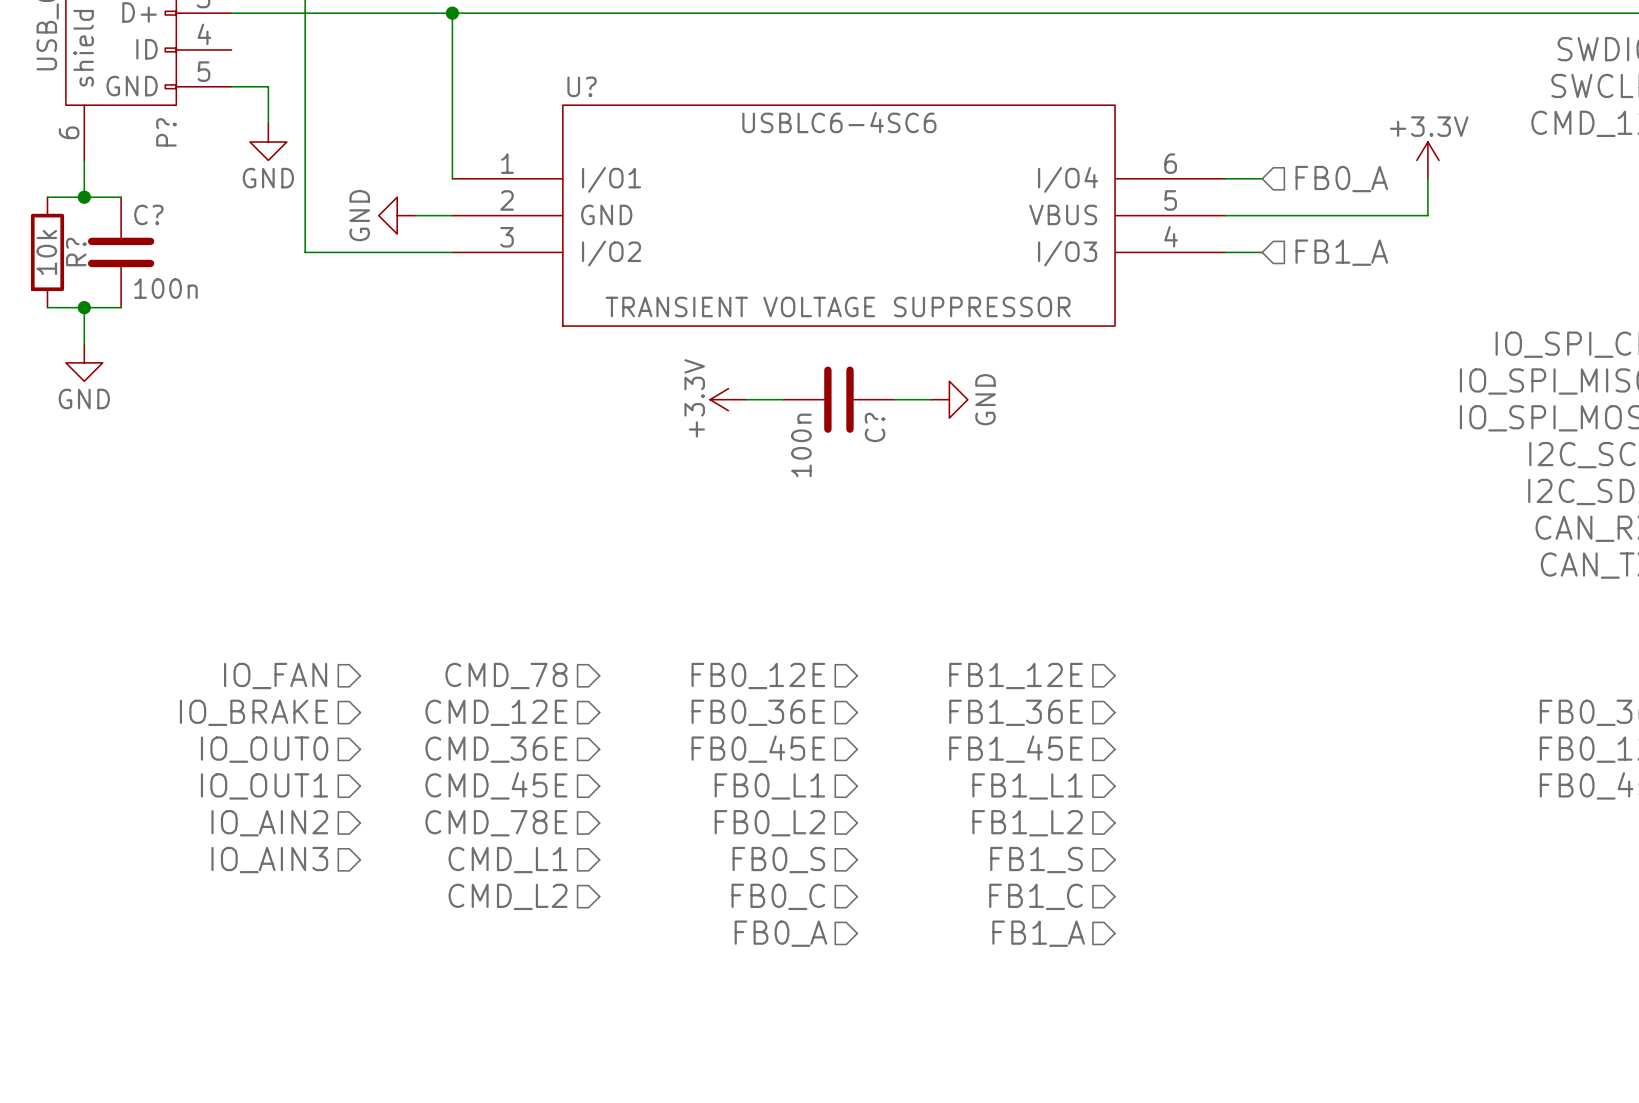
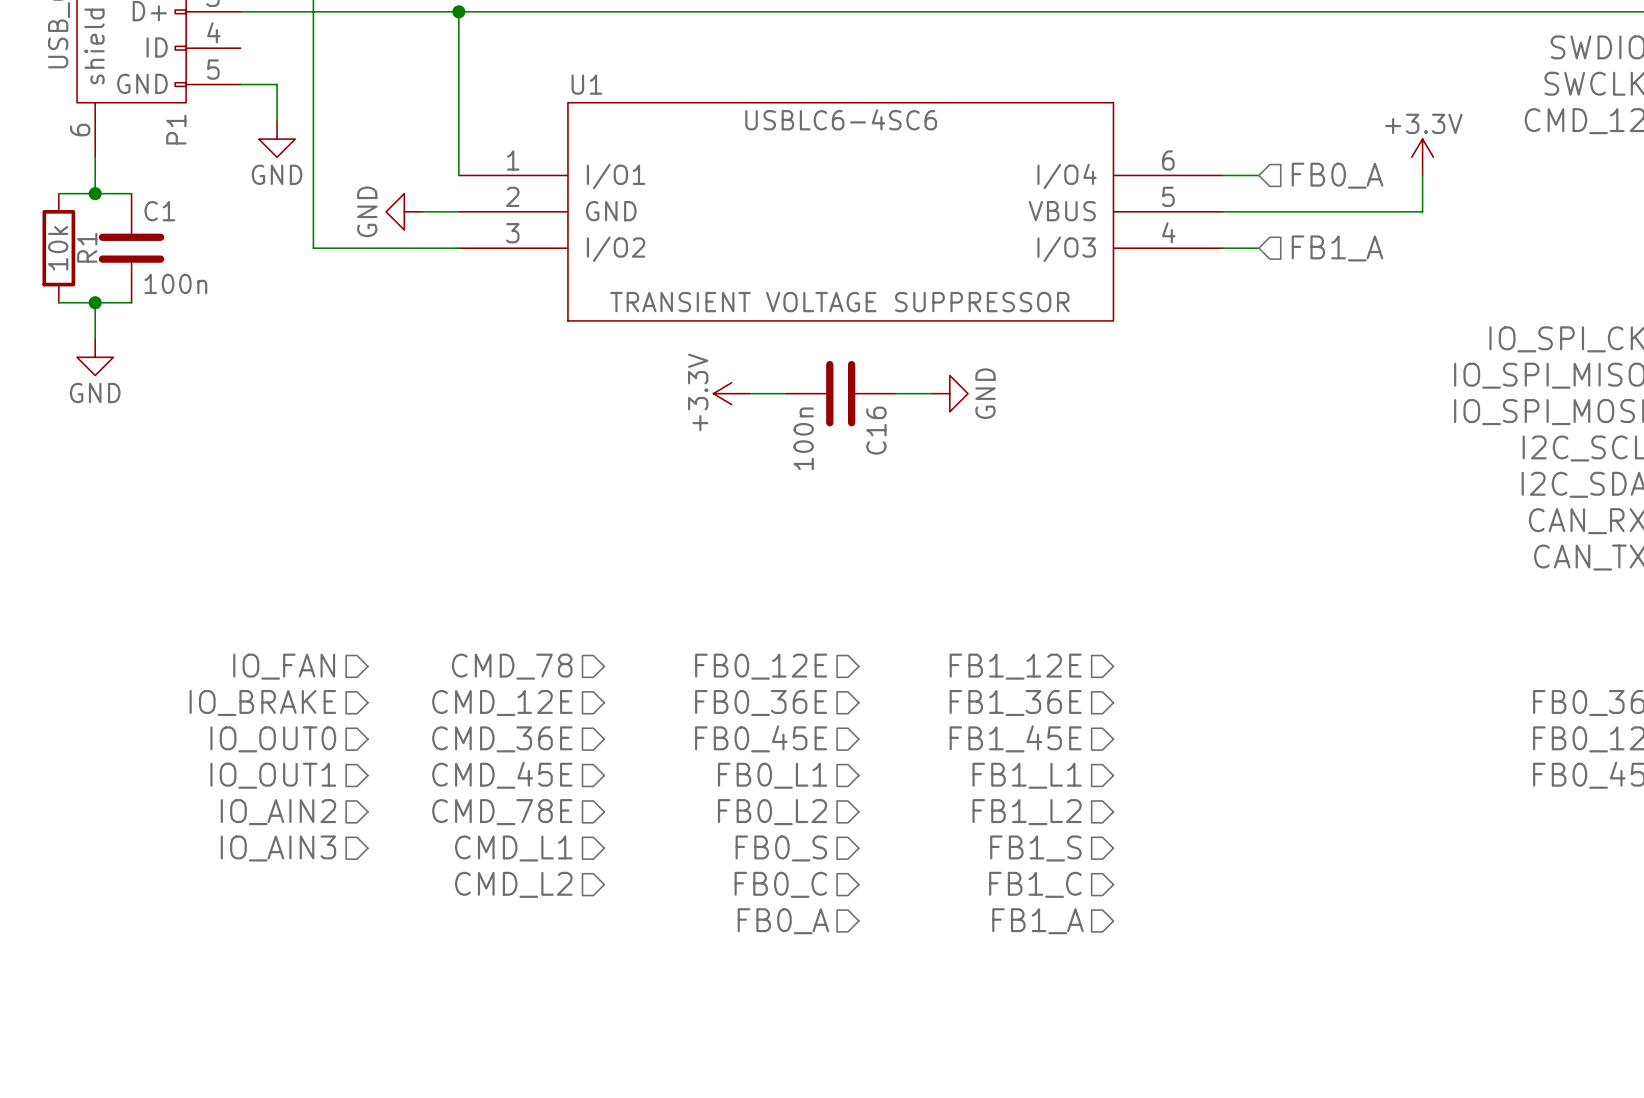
U? name: U? (582, 86) -> U1 (586, 84)
P? name: P? (166, 132) -> P1 (176, 129)
C? name: C? (148, 214) -> C1 (159, 211)
R? name: R? (76, 252) -> R1 (87, 247)
C? name: C? (875, 427) -> C16 (876, 430)

